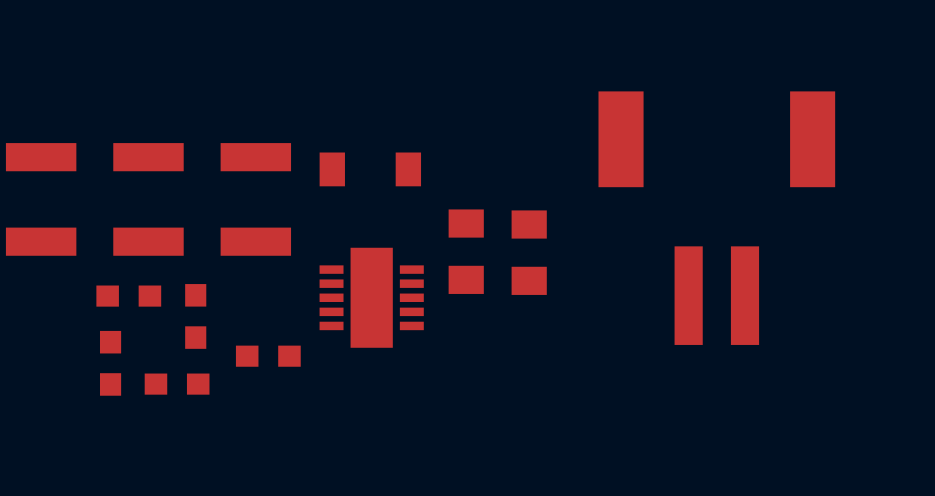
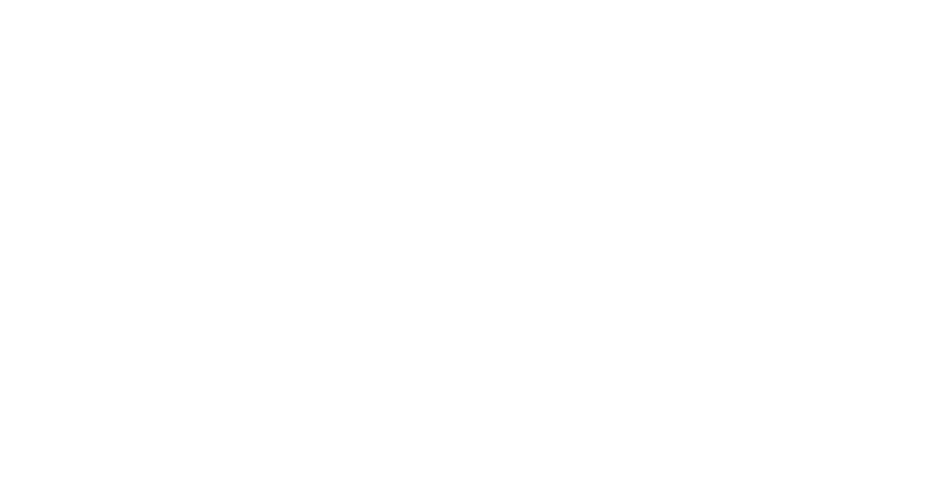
part: (370, 169) -> none
part: (41, 199) -> none
part: (148, 199) -> none
part: (255, 199) -> none
part: (716, 218) -> none
part: (466, 251) -> none
part: (529, 252) -> none
part: (128, 296) -> none
part: (371, 297) -> none
part: (195, 316) -> none
part: (268, 356) -> none
part: (110, 363) -> none
part: (177, 384) -> none

